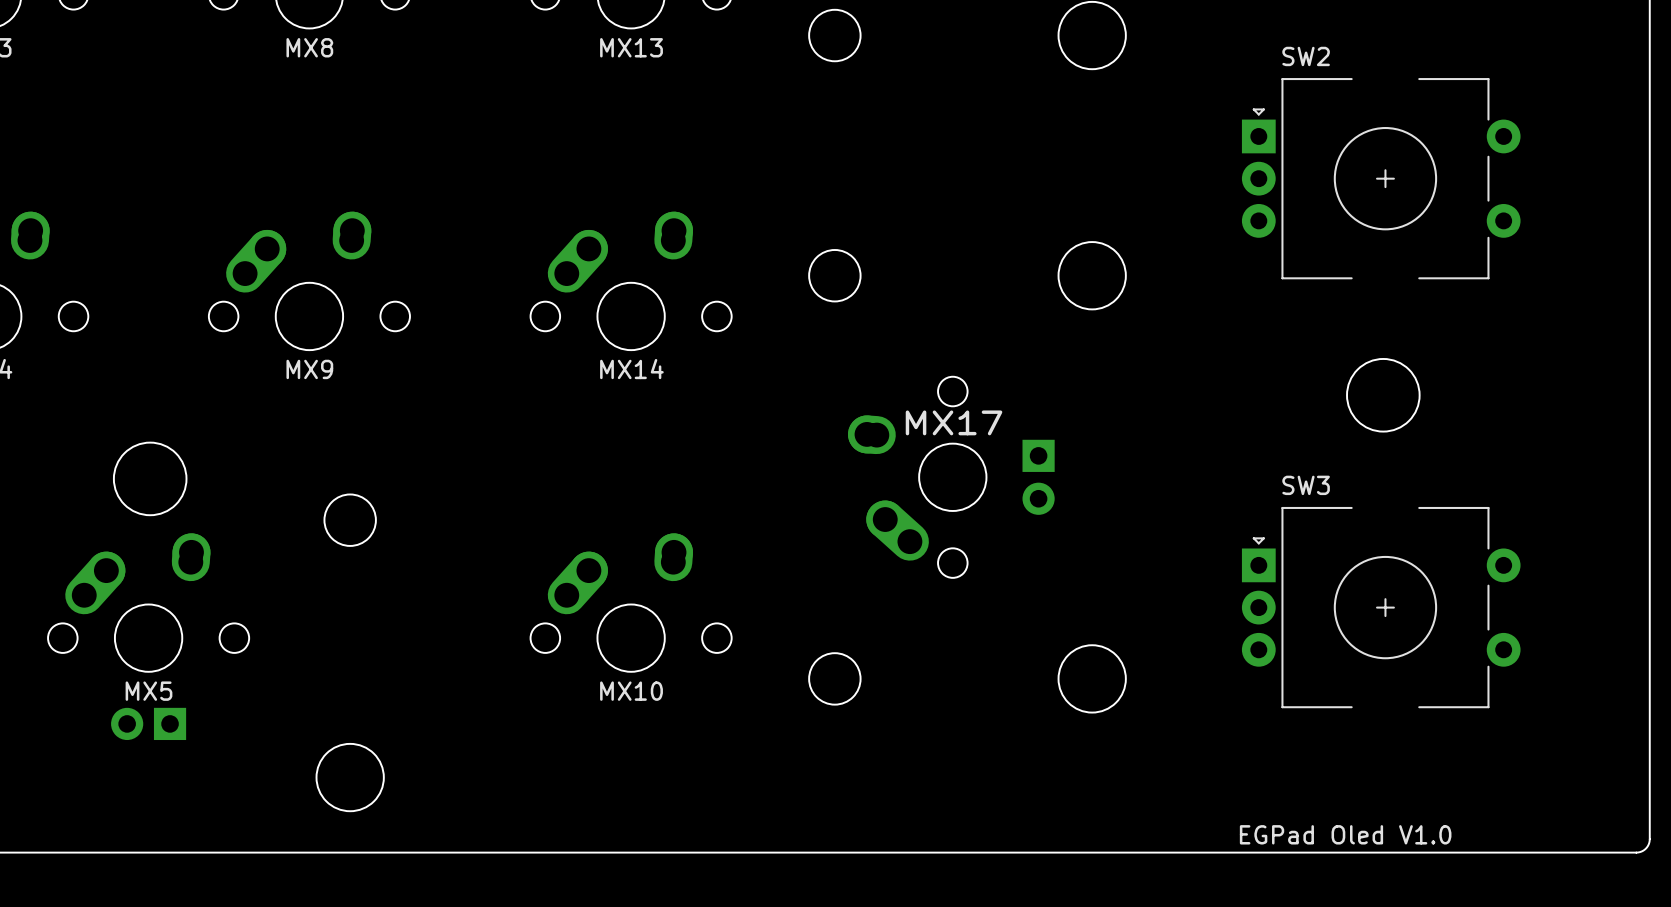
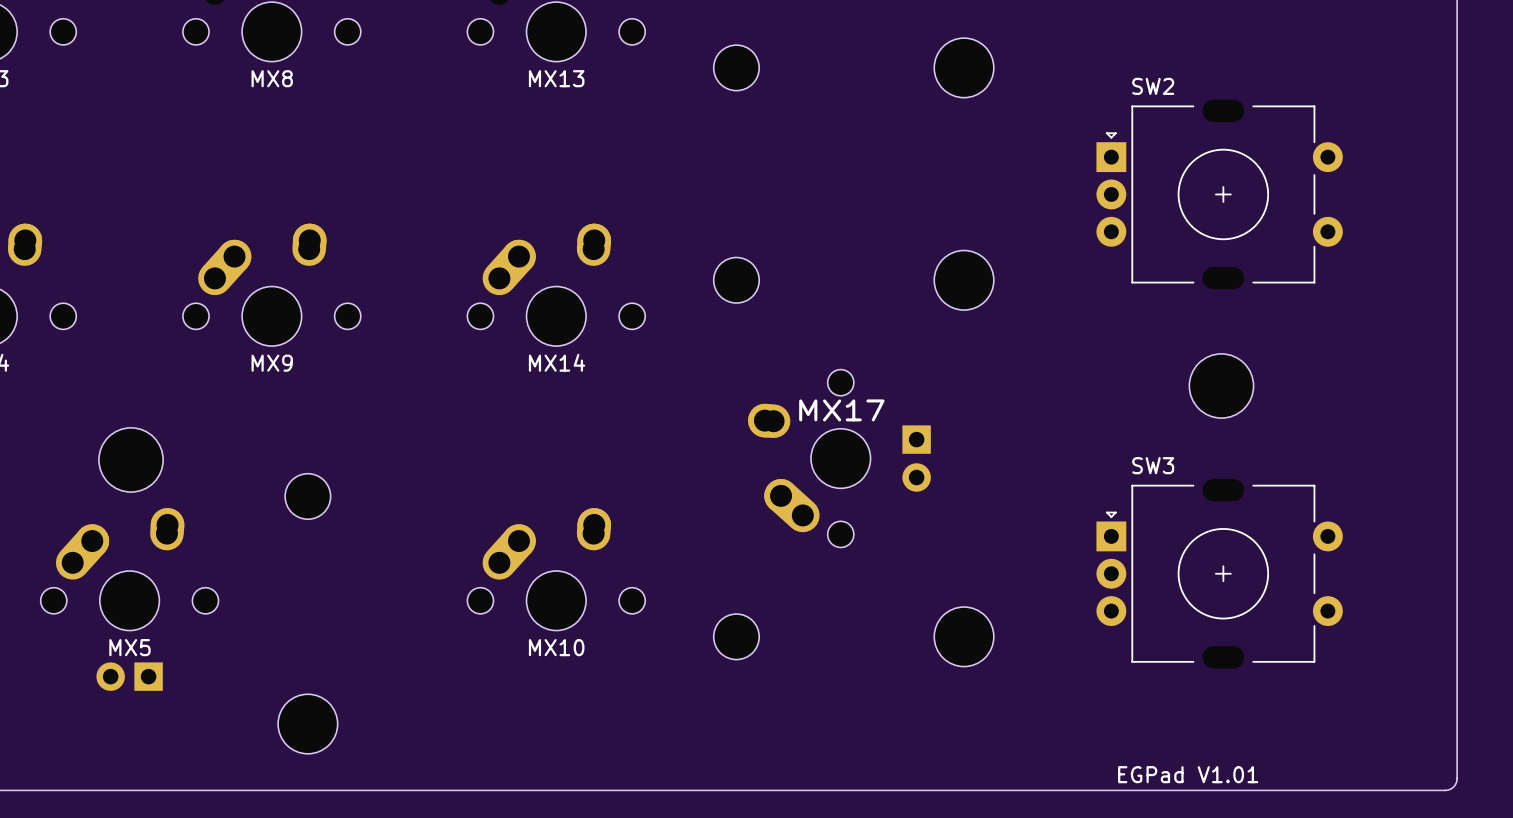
text: EGPad Oled V1.0 (1345, 834) -> EGPad V1.01 (1188, 774)

